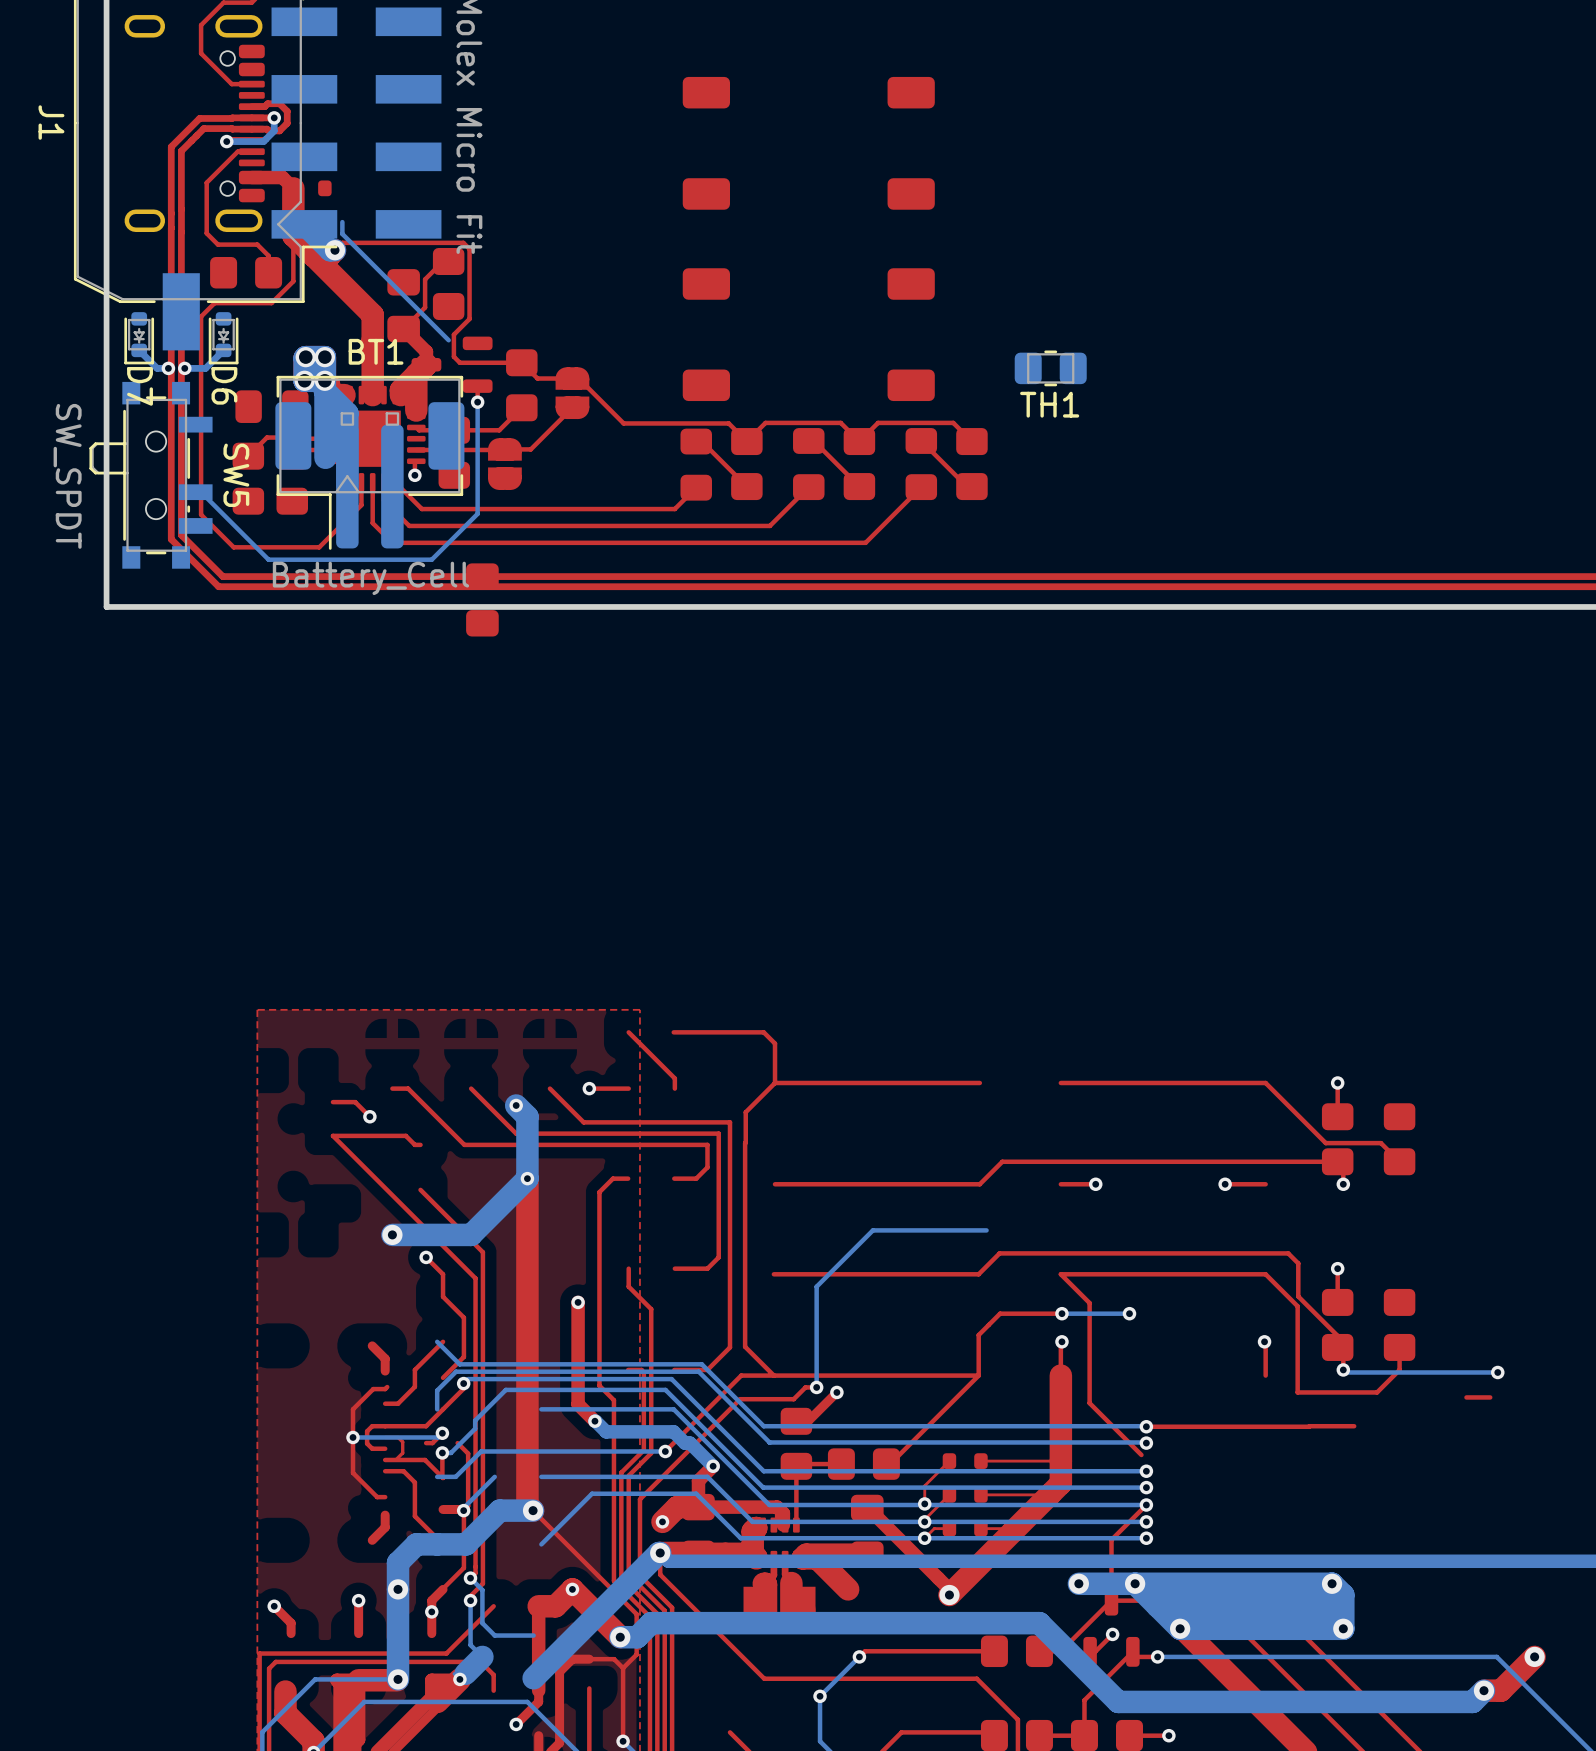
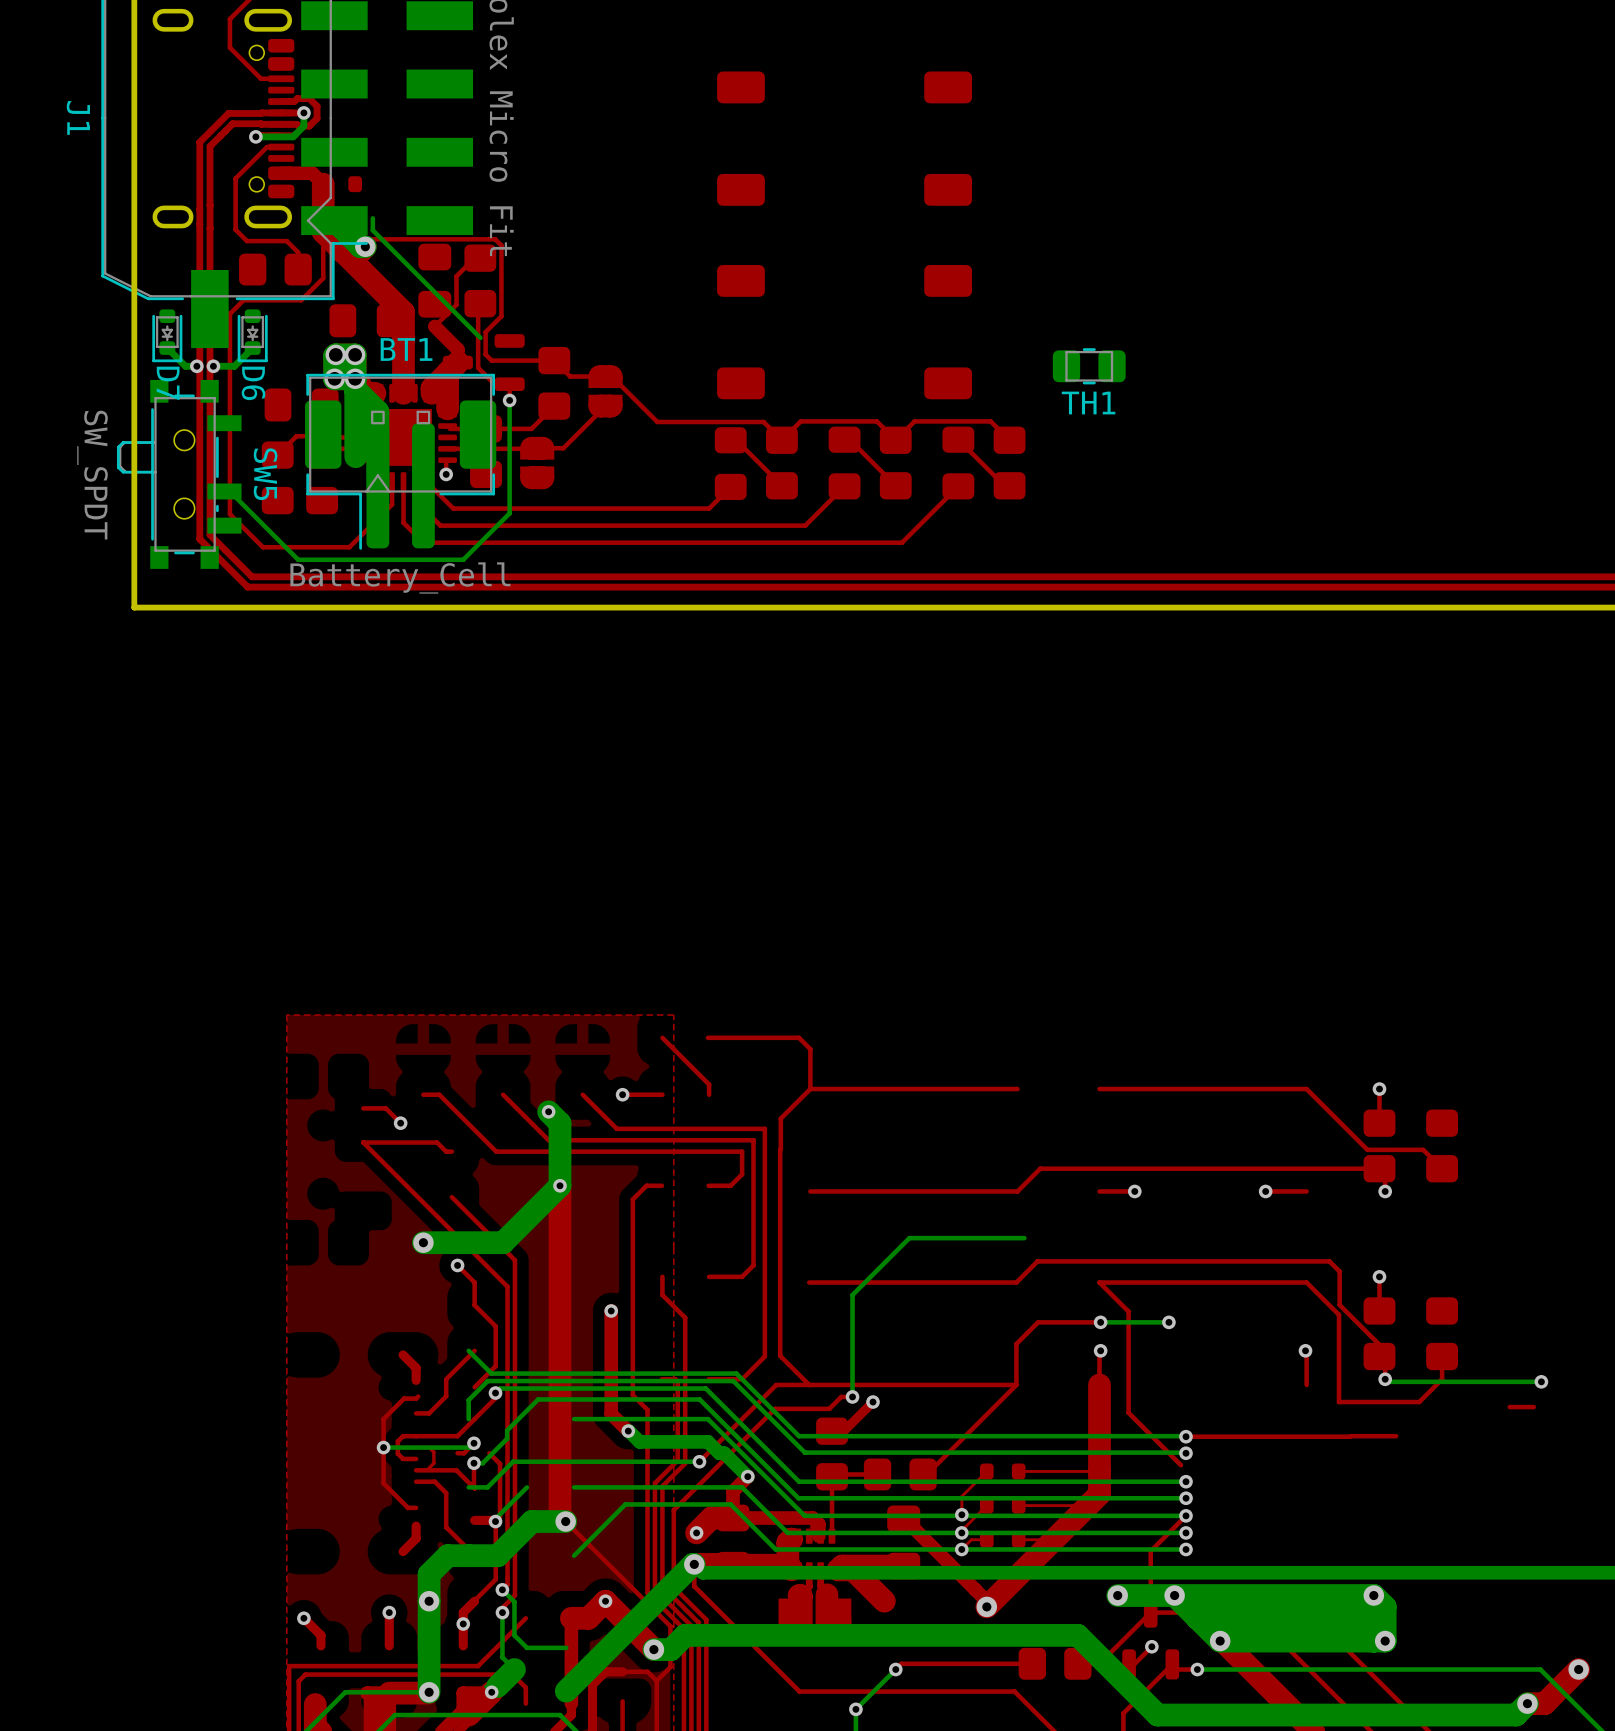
part position: (403, 305) -> (434, 280)
top track: none -> (480, 303) (478, 305) (478, 367) (494, 384) (509, 384)
part rotation: 0° (482, 599) -> 90° clockwise (366, 320)
part position: (482, 599) -> (366, 320)

